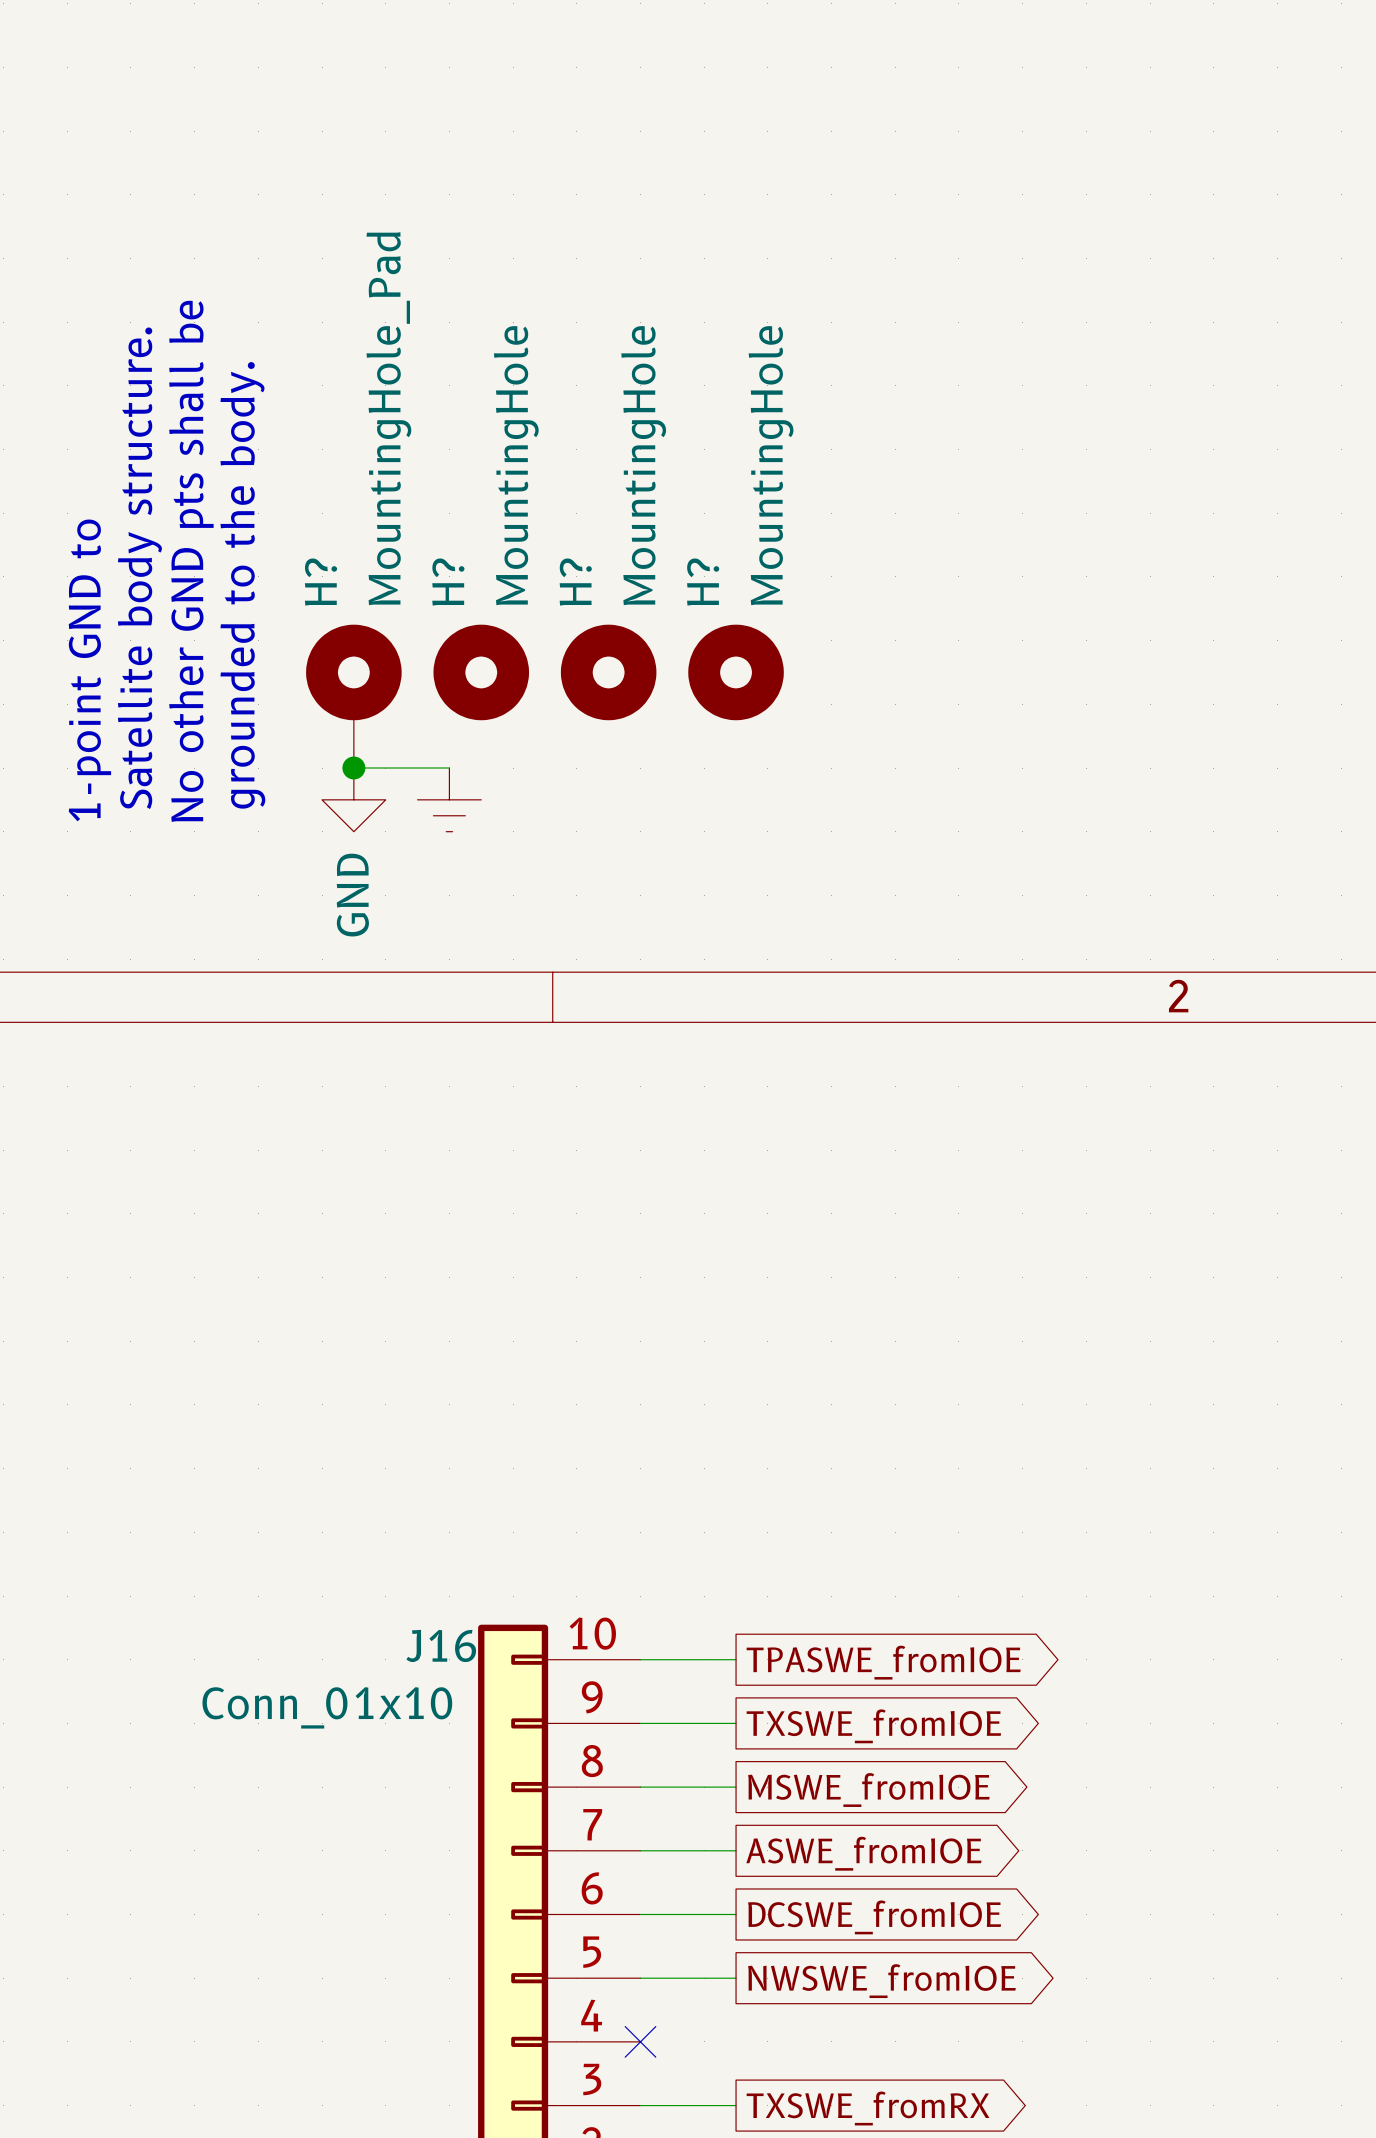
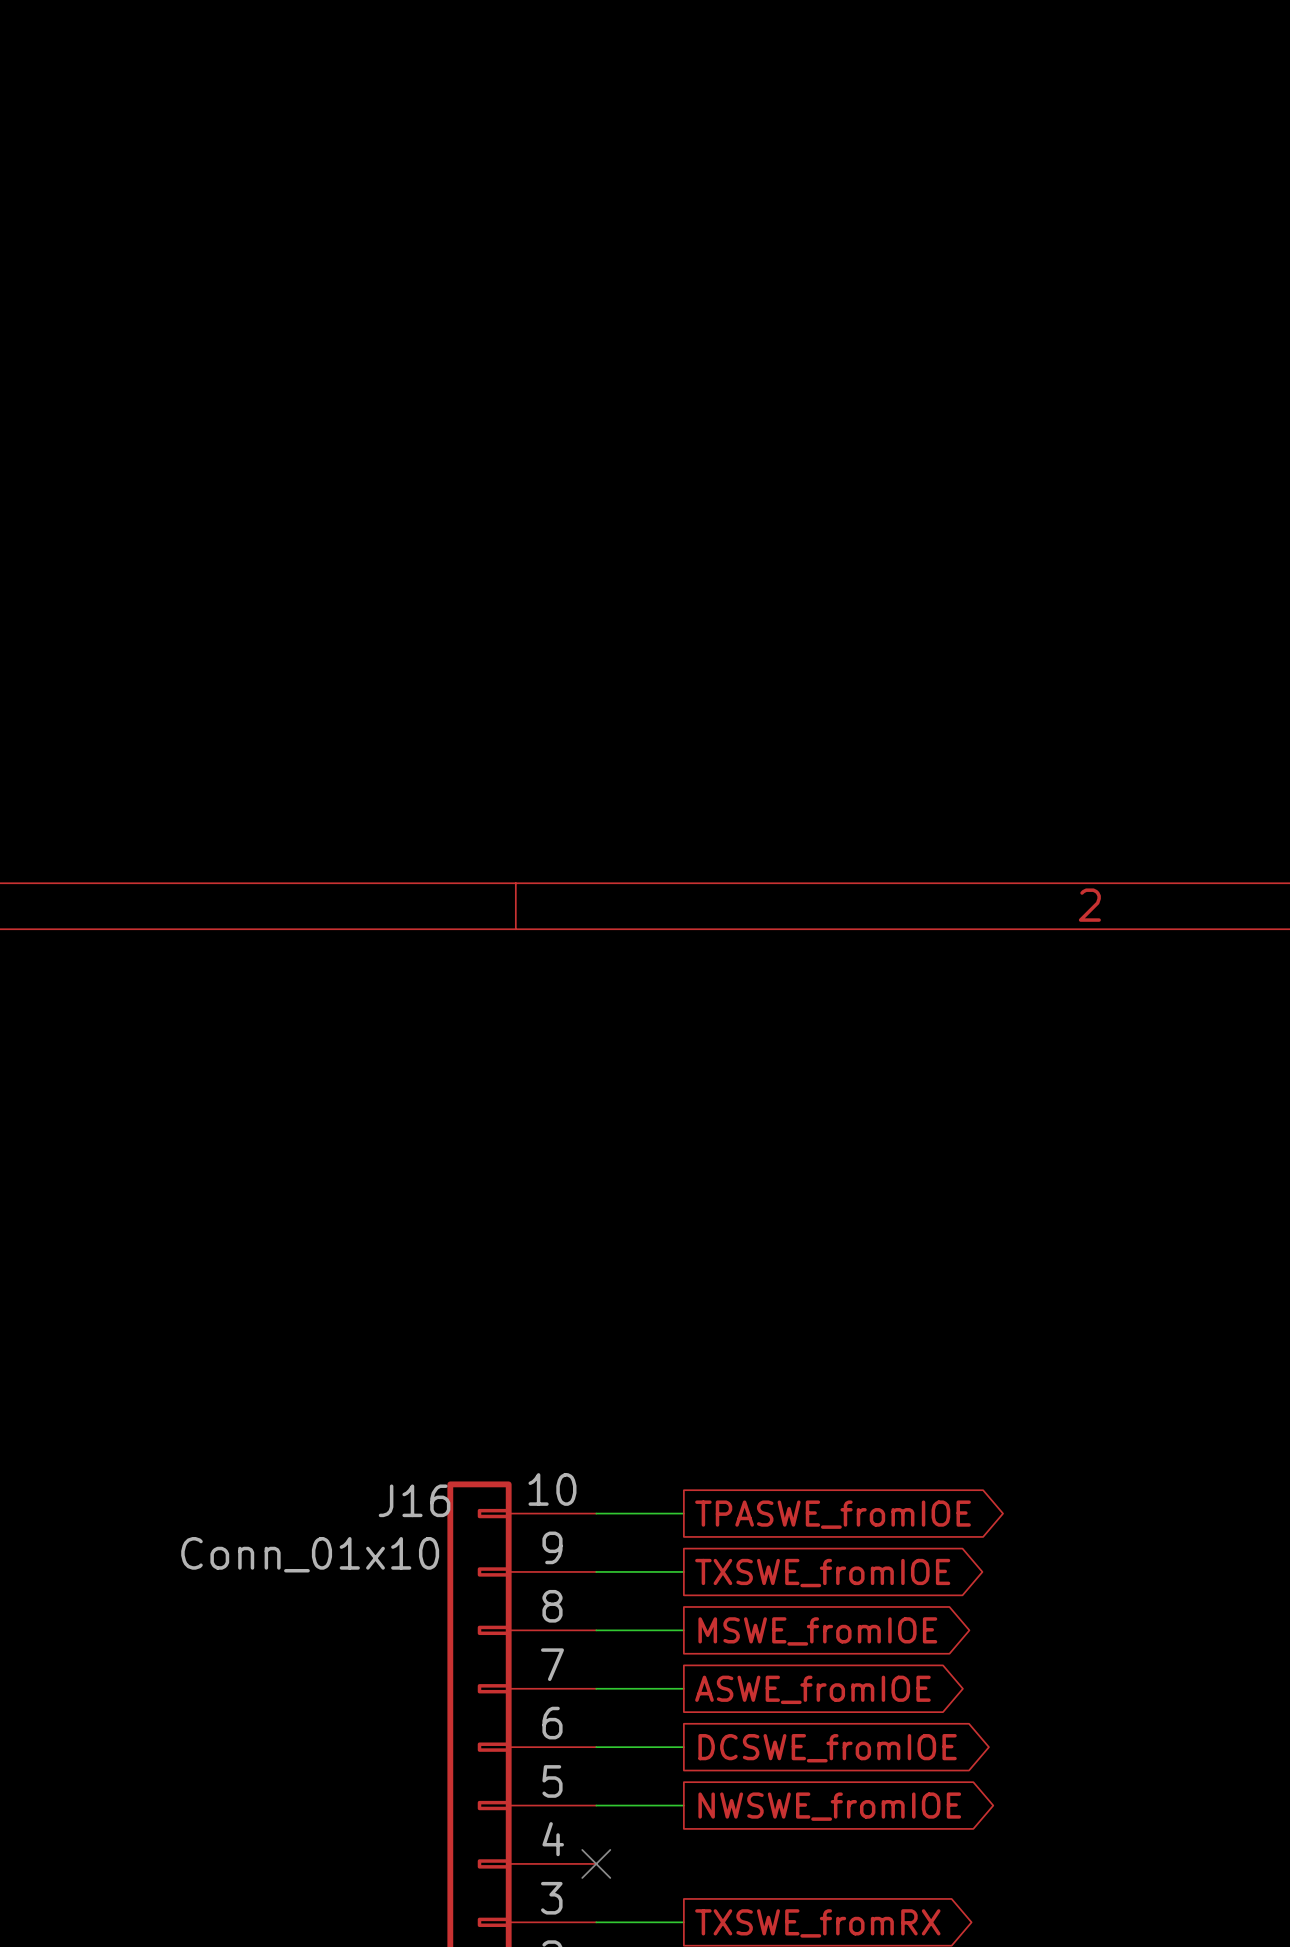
text: No other GND pts shall be (191, 561) -> none
text: Satellite body structure. (139, 568) -> none
text: grounded to the body. (242, 585) -> none
text: 1-point GND to (89, 670) -> none
H?: MountingHole (481, 672) -> none
H?: MountingHole (608, 672) -> none
H?: MountingHole (736, 672) -> none
H?: MountingHole_Pad (353, 696) -> none
wire: (353, 768) (449, 768) -> none
junction: (353, 768) -> none
power symbol: GND (353, 799) -> none
power symbol: (449, 799) -> none

